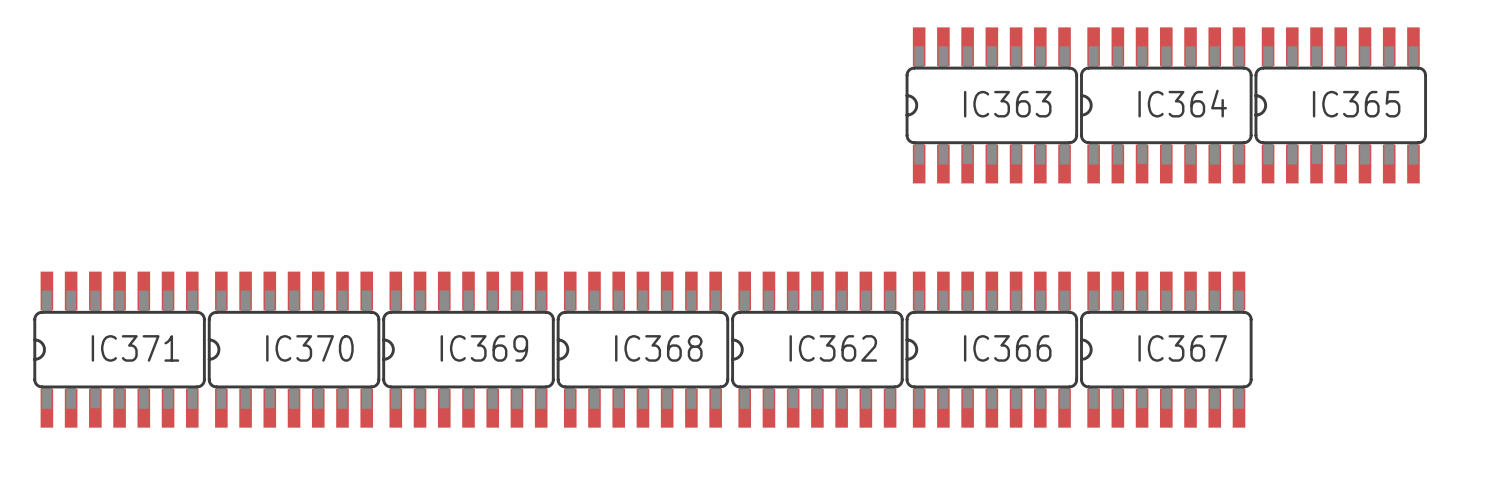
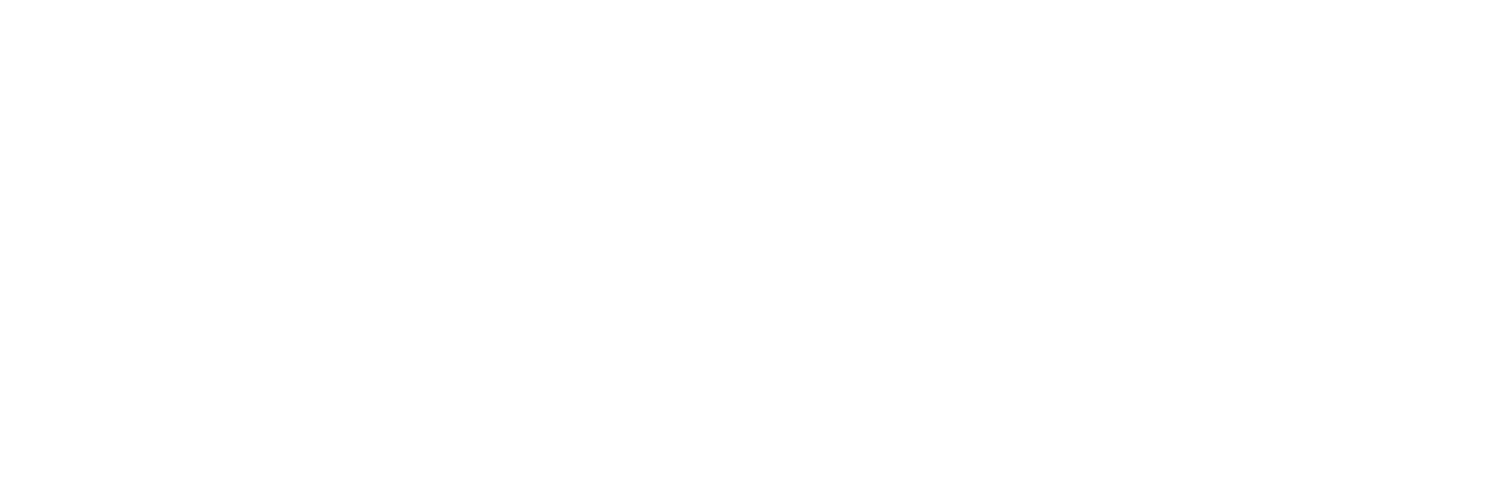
IC363: (991, 105) -> none
IC364: (1166, 105) -> none
IC365: (1340, 105) -> none
IC371: (119, 349) -> none
IC370: (294, 349) -> none
IC369: (468, 349) -> none
IC368: (642, 349) -> none
IC362: (817, 349) -> none
IC366: (991, 349) -> none
IC367: (1166, 349) -> none

